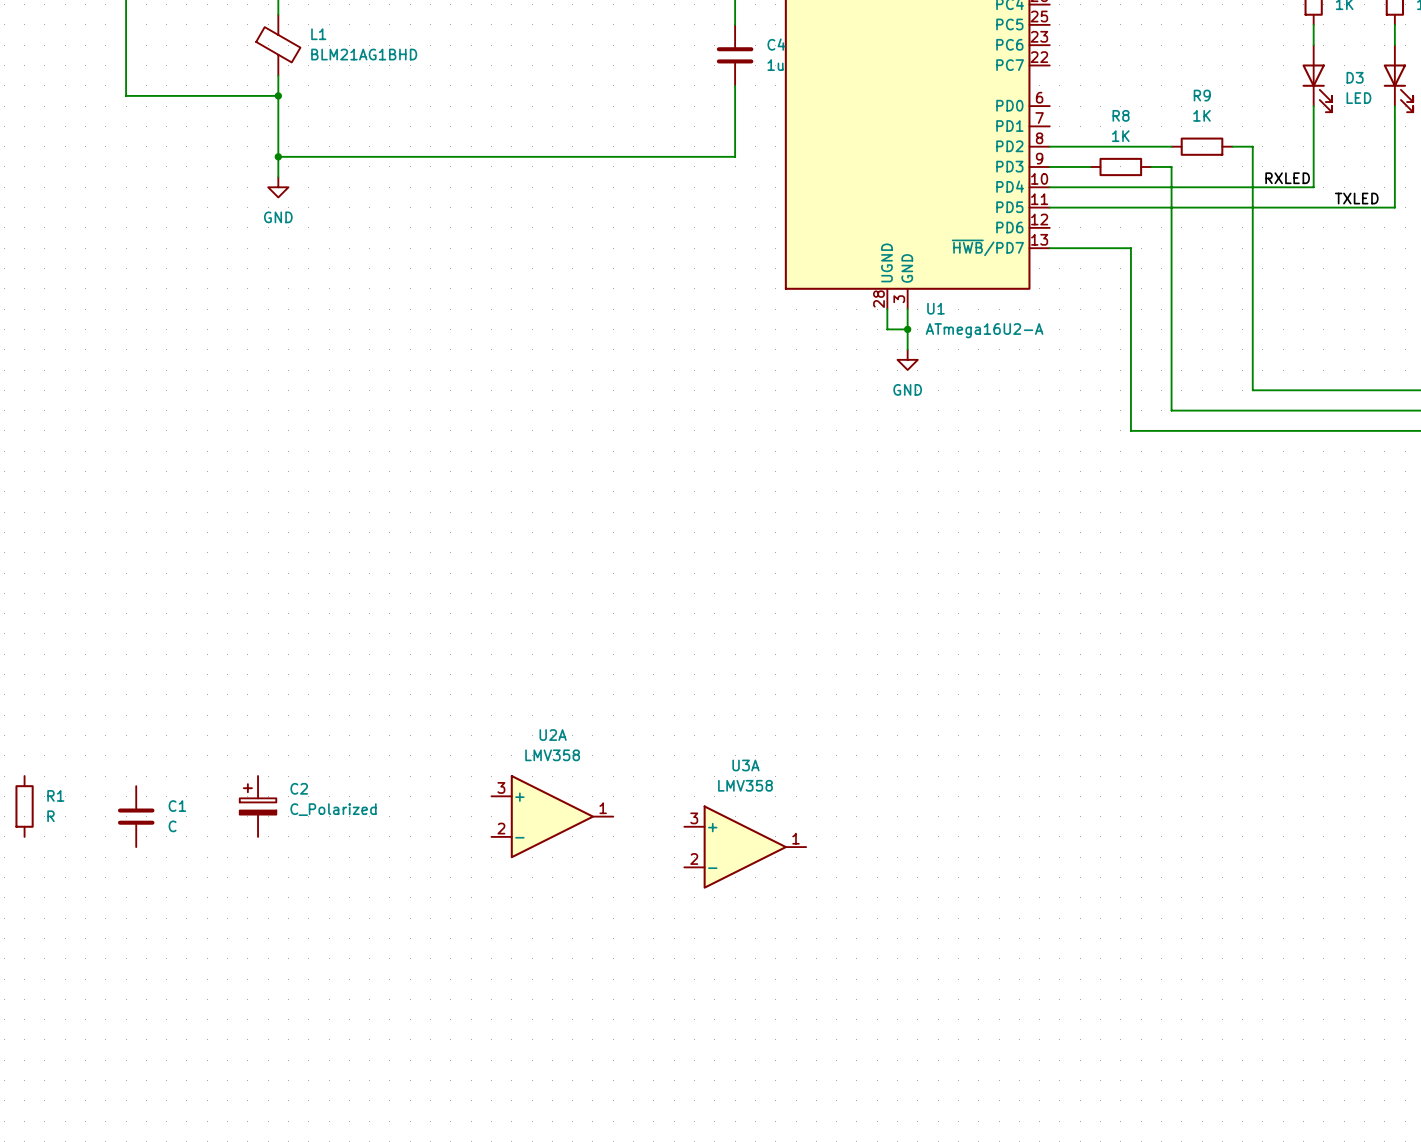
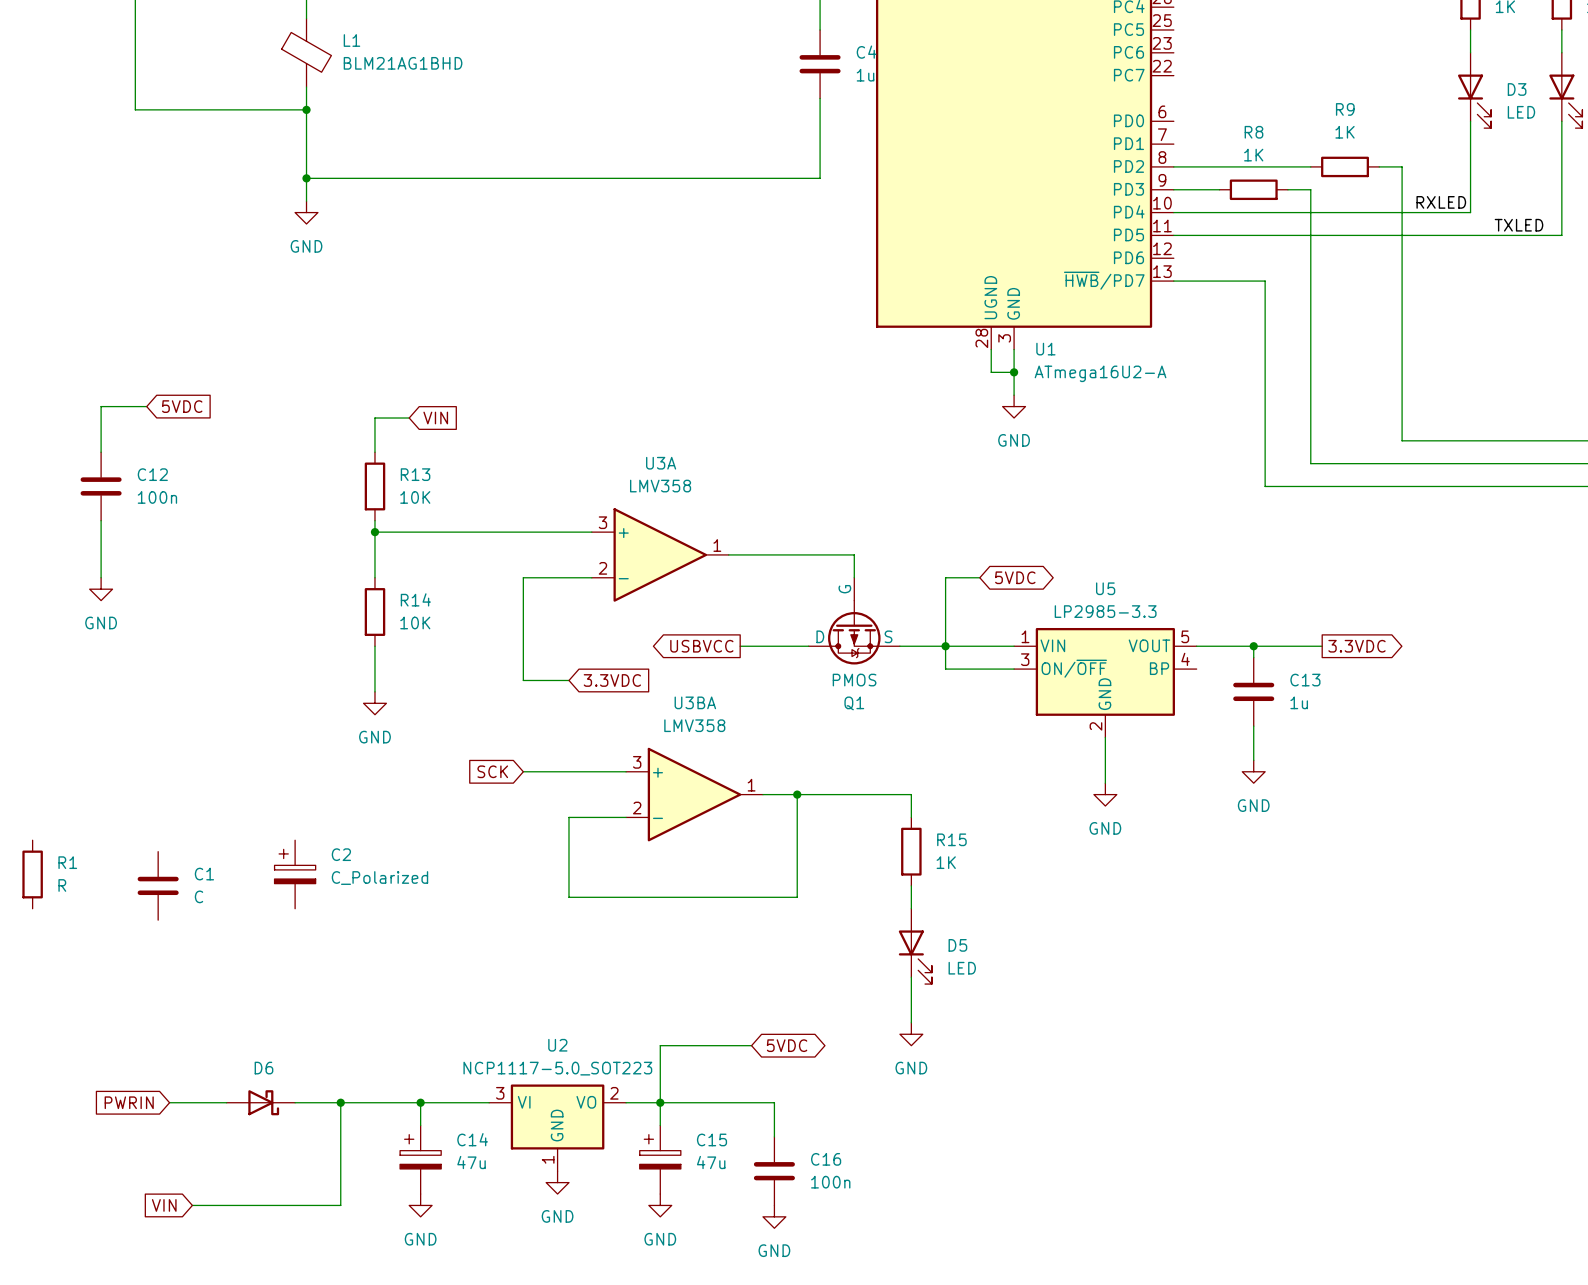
wire: none -> (146, 406) (101, 406) (101, 452)
global label: none -> 5VDC (182, 406)
wire: none -> (409, 418) (374, 418) (374, 452)
global label: none -> VIN (435, 418)
C12: none -> 100n (101, 486)
R13: none -> 10K (374, 486)
wire: none -> (101, 520) (101, 577)
wire: none -> (374, 520) (374, 577)
wire: none -> (374, 532) (591, 532)
junction: none -> (374, 532)
wire: none -> (728, 554) (854, 554) (854, 577)
wire: none -> (591, 577) (523, 577) (523, 680) (568, 680)
wire: none -> (979, 577) (945, 577) (945, 669) (1014, 669)
global label: none -> 5VDC (1015, 577)
power symbol: none -> GND (101, 589)
R14: none -> 10K (374, 612)
Q1: none -> PMOS (854, 621)
wire: none -> (374, 646) (374, 691)
global label: none -> USBVCC (701, 646)
wire: none -> (740, 646) (808, 646)
wire: none -> (899, 646) (1014, 646)
junction: none -> (945, 646)
wire: none -> (1196, 646) (1322, 646)
wire: none -> (1253, 646) (1253, 657)
junction: none -> (1253, 646)
global label: none -> 3.3VDC (1356, 646)
global label: none -> 3.3VDC (612, 680)
U5: none -> LP2985-3.3 (1105, 682)
C13: none -> 1u (1253, 691)
power symbol: none -> GND (374, 703)
wire: none -> (1253, 726) (1253, 760)
wire: none -> (1105, 737) (1105, 783)
global label: none -> SCK (492, 771)
wire: none -> (523, 771) (626, 771)
power symbol: none -> GND (1253, 771)
U3BA: none -> LMV358 (694, 794)
wire: none -> (763, 794) (911, 794) (911, 817)
wire: none -> (797, 794) (797, 897) (568, 897) (568, 817) (626, 817)
junction: none -> (797, 794)
power symbol: none -> GND (1105, 794)
R15: none -> 1K (911, 851)
wire: none -> (911, 885) (911, 908)
R1 position: (24, 806) -> (32, 874)
C2 position: (258, 806) -> (295, 874)
C1 position: (136, 816) -> (158, 885)
U2A: LMV358 (552, 816) -> none
D5: none -> LED (915, 946)
U3A position: (745, 847) -> (660, 554)
wire: none -> (911, 977) (911, 1022)
power symbol: none -> GND (911, 1034)
wire: none -> (751, 1045) (660, 1045) (660, 1125)
global label: none -> 5VDC (787, 1045)
global label: none -> PWRIN (129, 1102)
wire: none -> (169, 1102) (226, 1102)
D6: none -> (260, 1102)
wire: none -> (295, 1102) (489, 1102)
wire: none -> (340, 1102) (340, 1205) (192, 1205)
junction: none -> (340, 1102)
wire: none -> (420, 1102) (420, 1125)
junction: none -> (420, 1102)
wire: none -> (626, 1102) (774, 1102) (774, 1136)
junction: none -> (660, 1102)
U2: none -> NCP1117-5.0_SOT223 (557, 1127)
C14: none -> 47u (420, 1159)
C15: none -> 47u (660, 1159)
C16: none -> 100n (774, 1171)
power symbol: none -> GND (557, 1182)
global label: none -> VIN (164, 1205)
power symbol: none -> GND (420, 1205)
power symbol: none -> GND (660, 1205)
power symbol: none -> GND (774, 1216)

